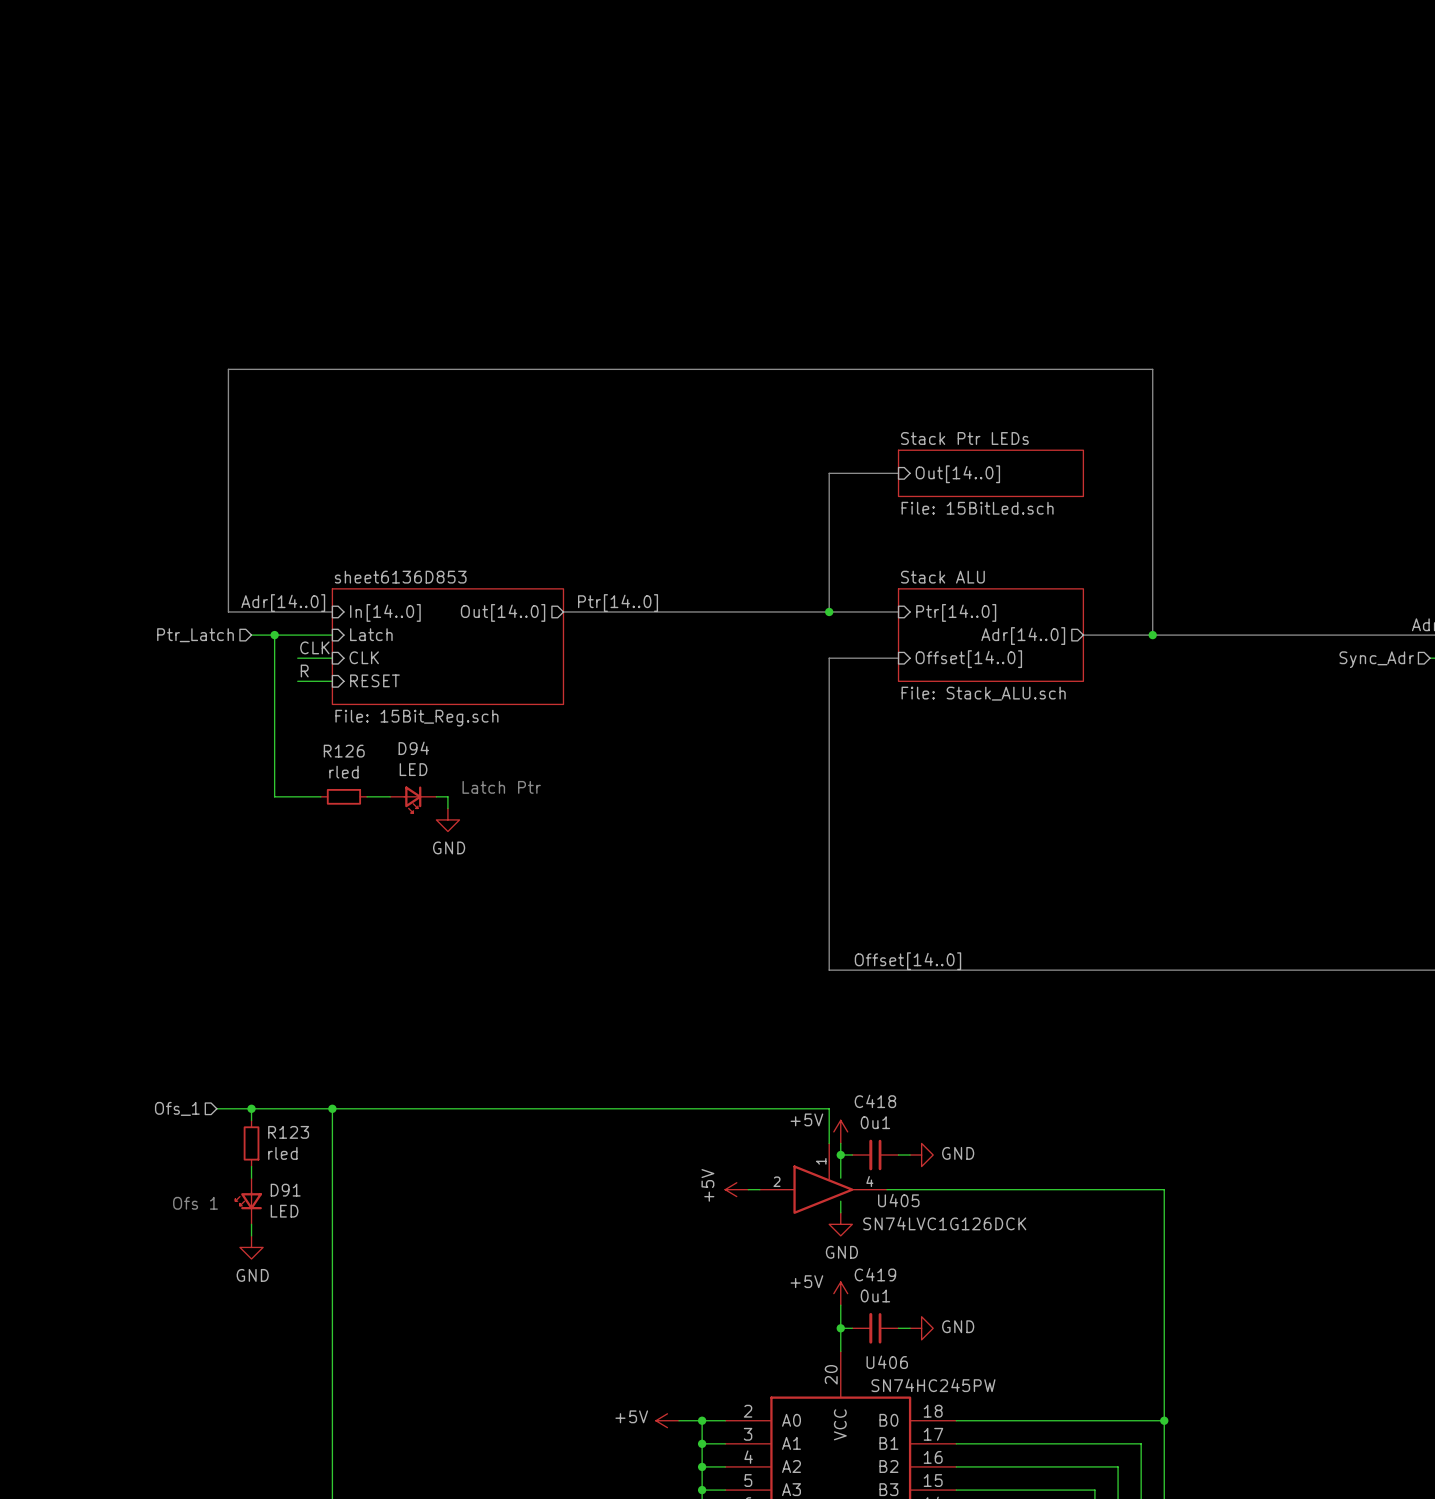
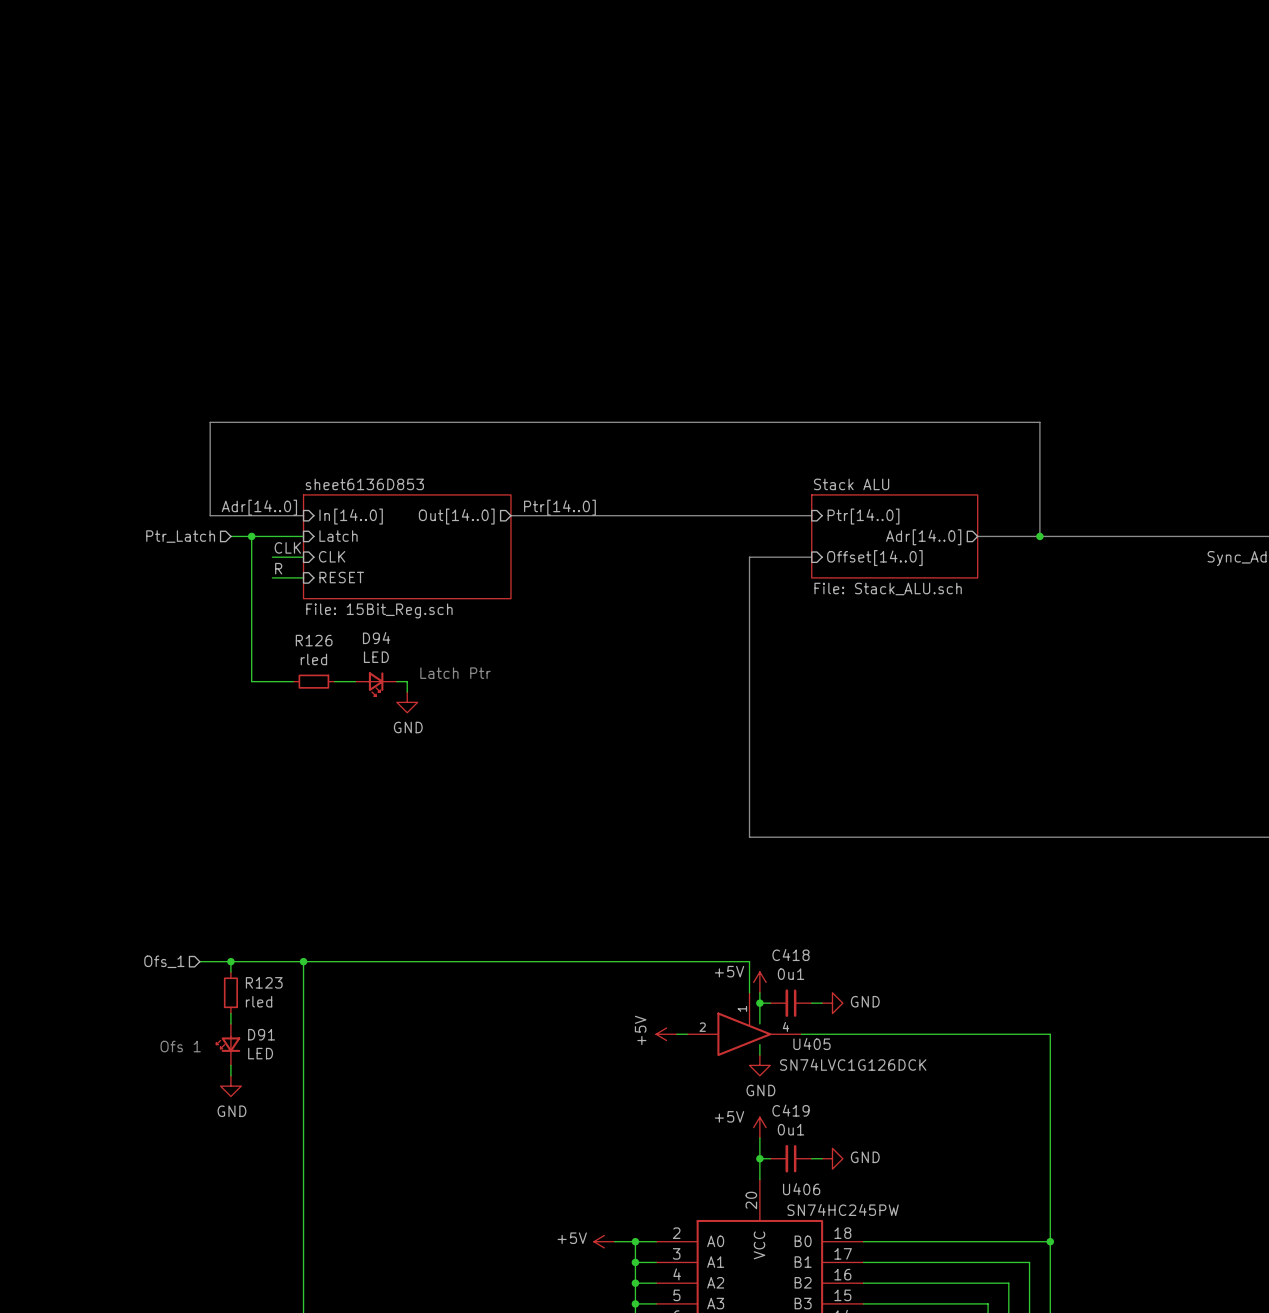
bus: (898, 473) (829, 473) (829, 611) -> none
sheet Stack Ptr LEDs: File: 15BitLed.sch (990, 473) -> none
sheet pin: Out[14..0] (957, 474) -> none
bus: (228, 508) (228, 369) (1152, 369) (1152, 508) -> (210, 422) (1039, 422)
junction: (829, 611) -> none
label: Offset[14..0] (907, 961) -> none

